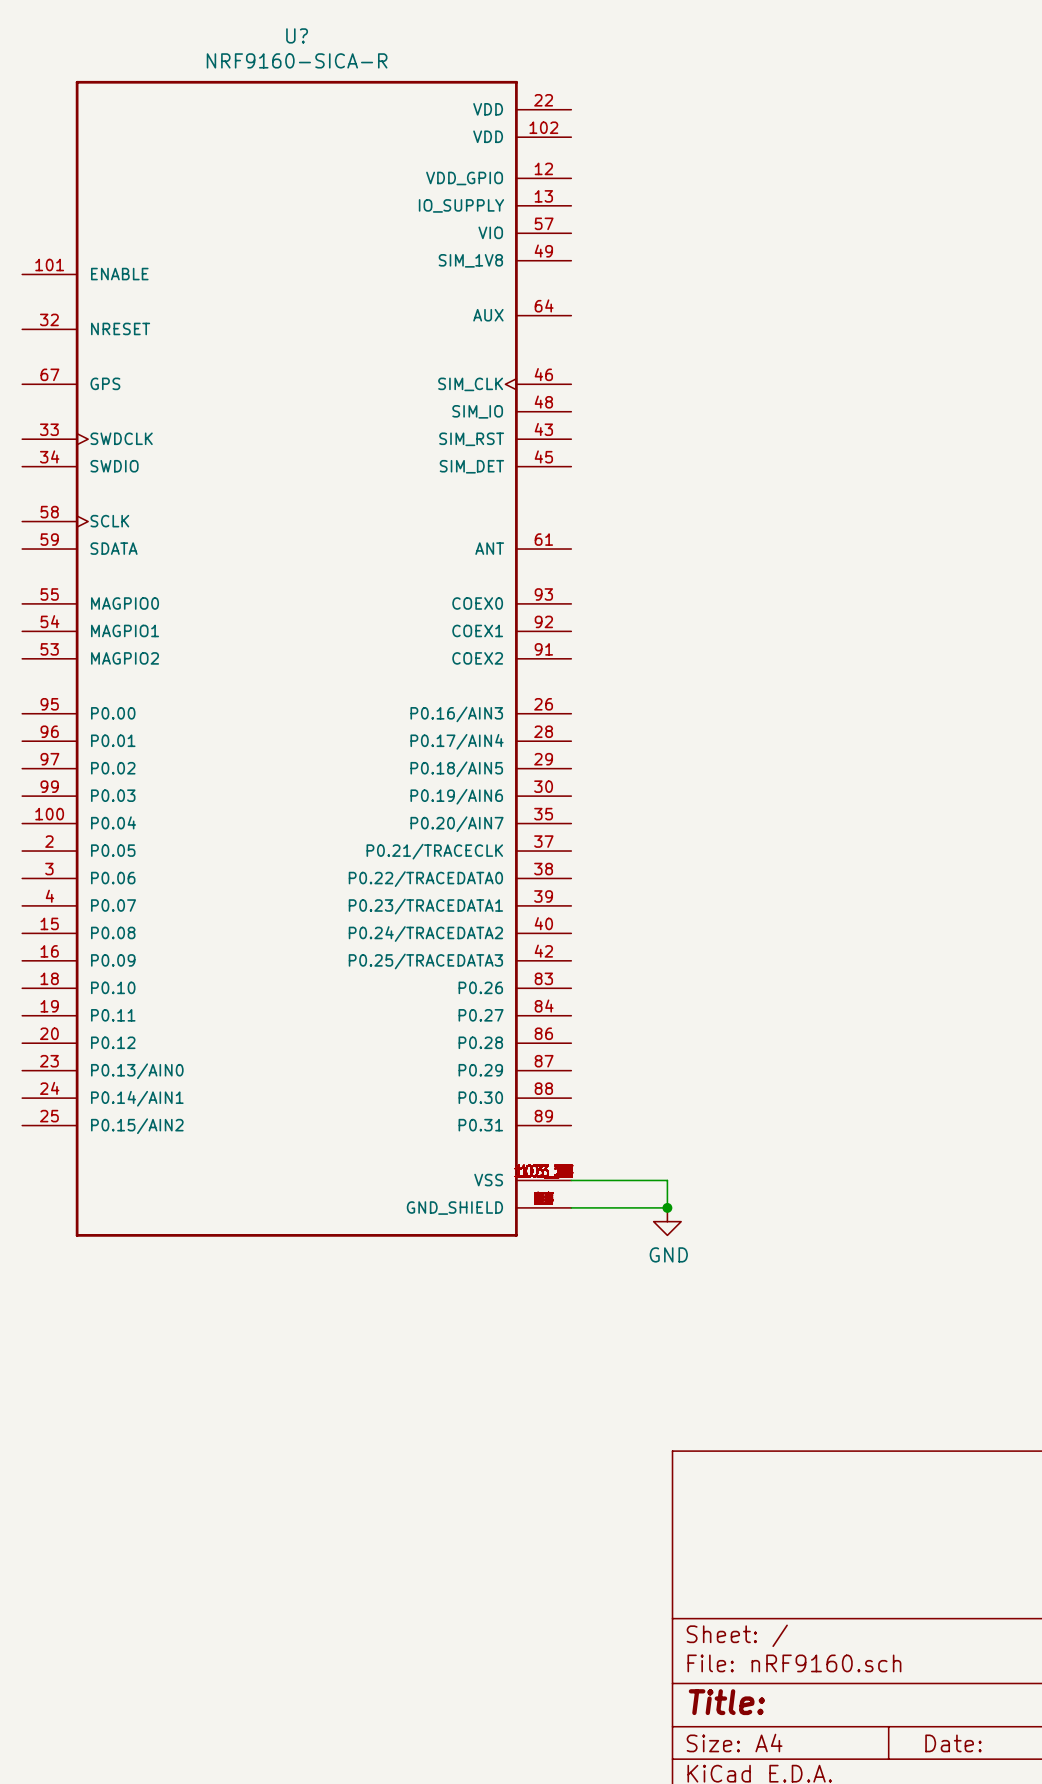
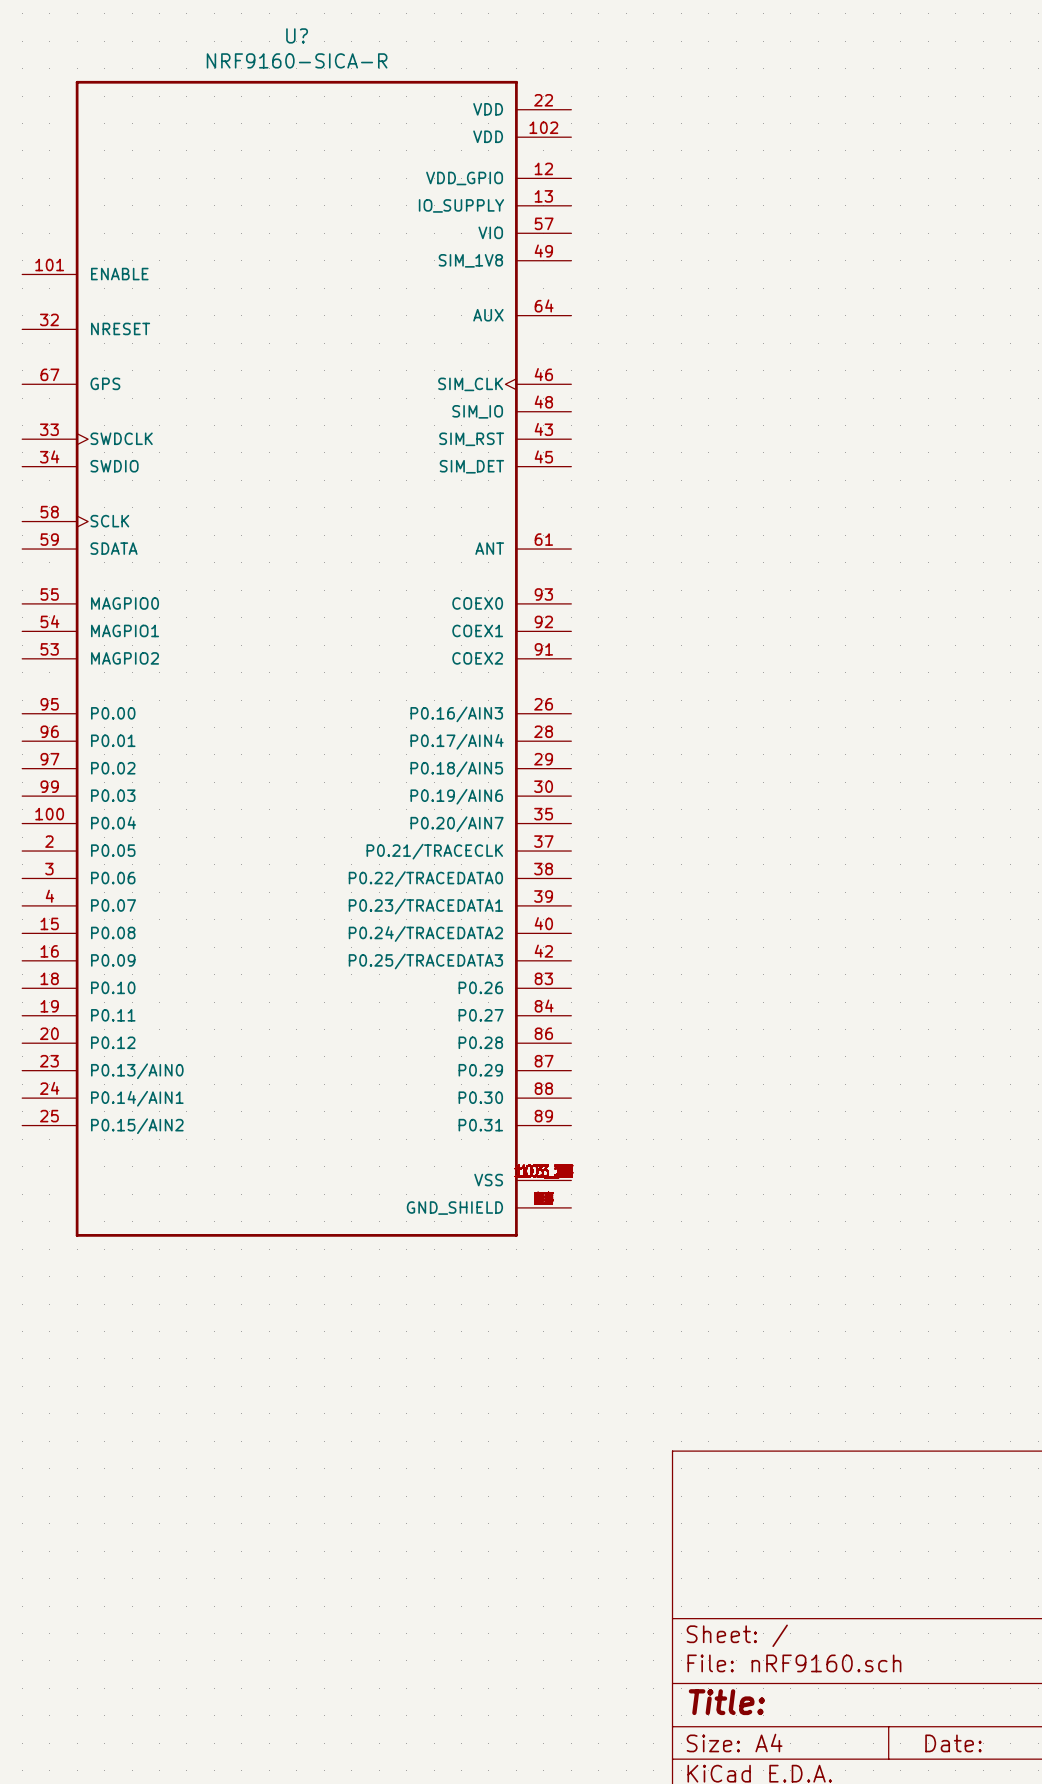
wire: (571, 1180) (667, 1180) (667, 1207) (571, 1207) -> none
junction: (667, 1207) -> none
power symbol: GND (667, 1221) -> none

